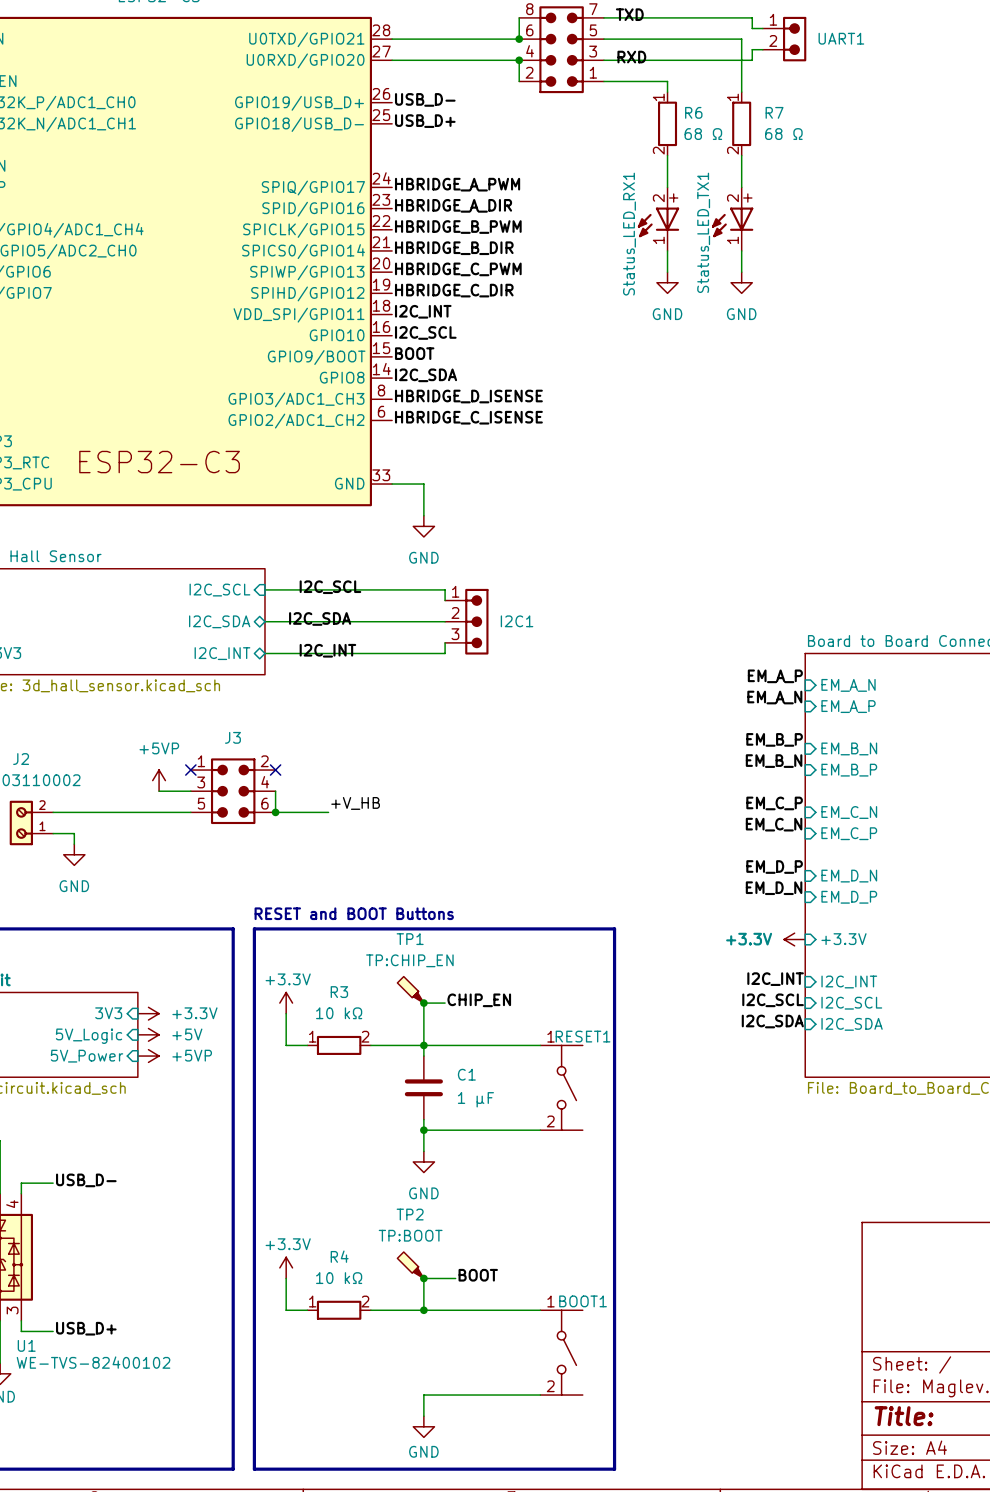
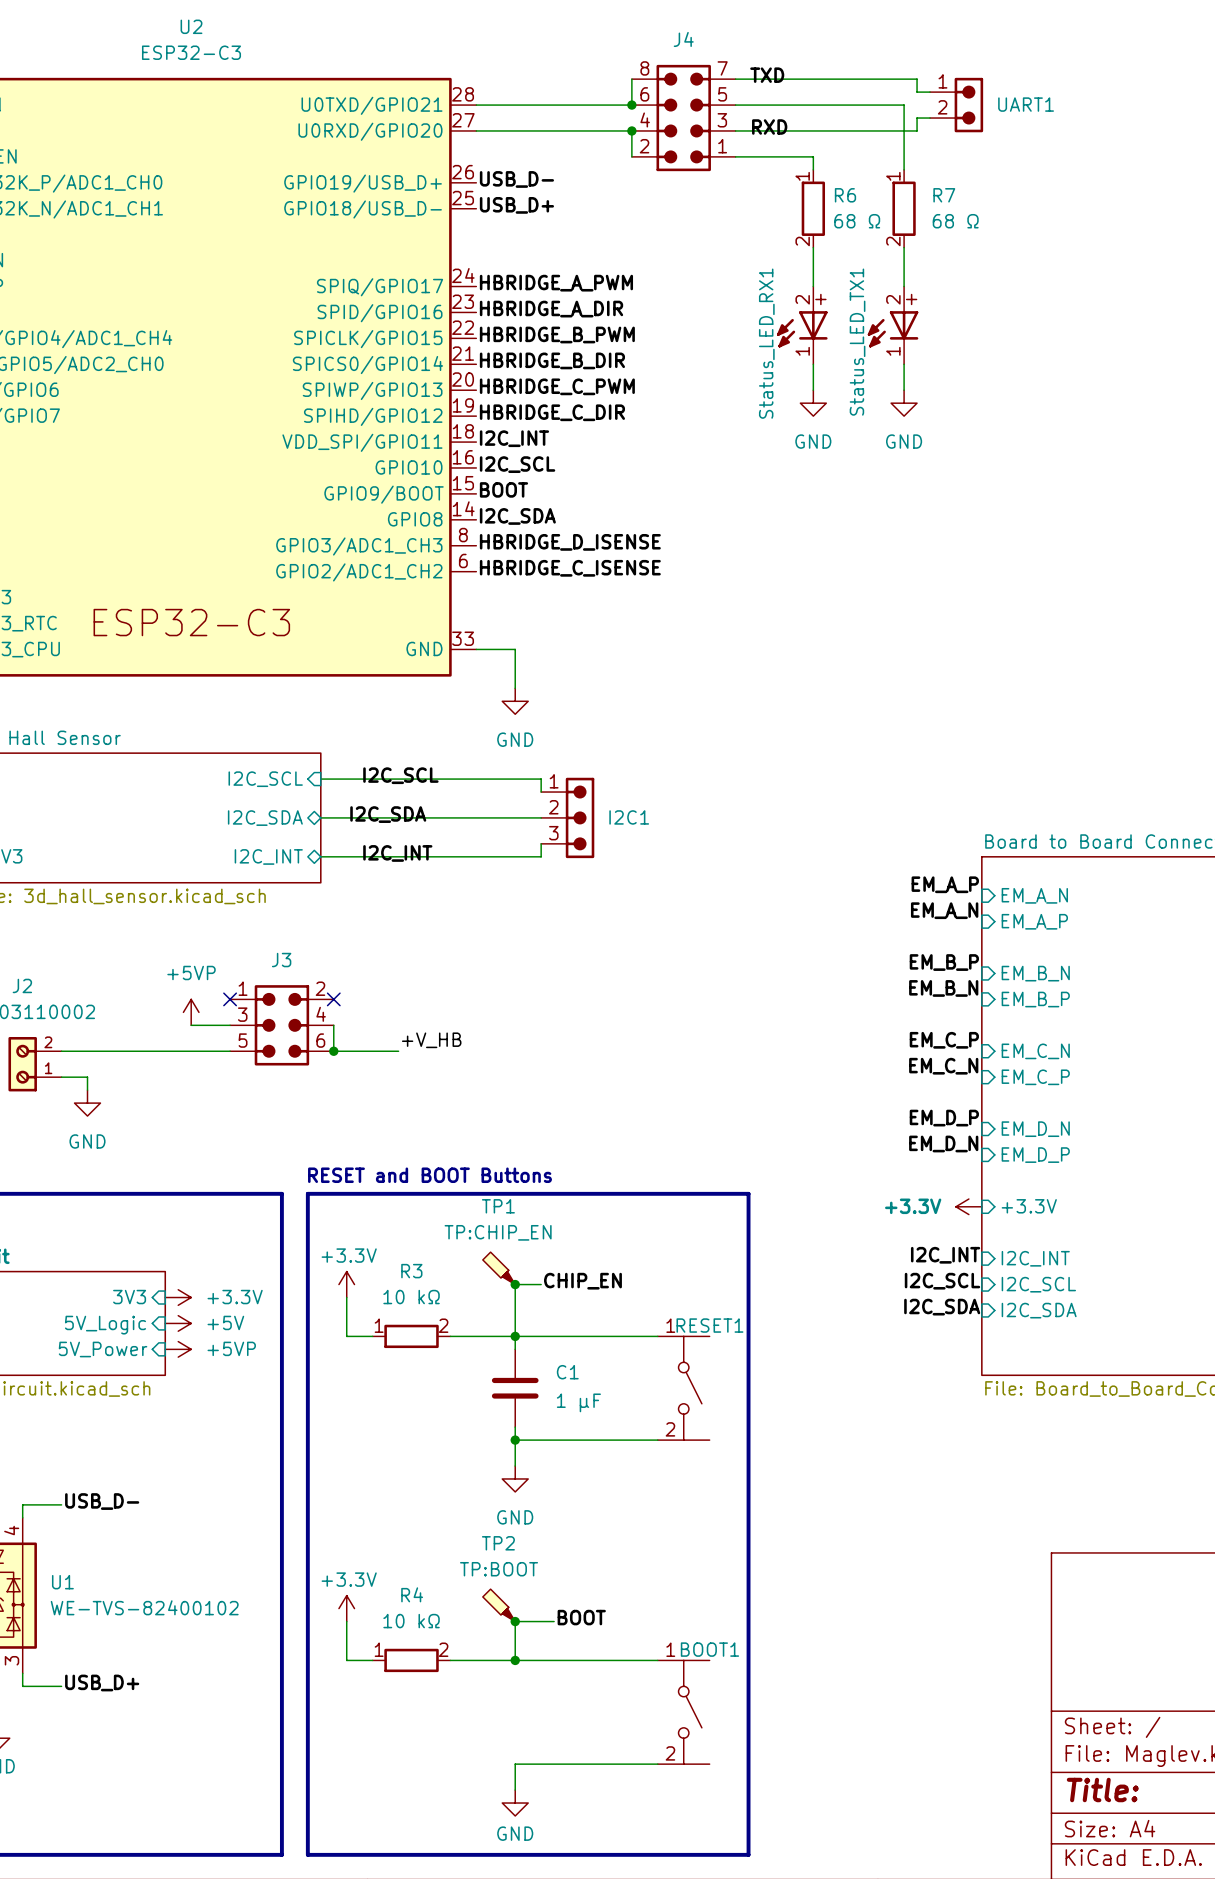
U1 name position: U1 (26, 1345) -> U1 (62, 1582)
U1 value position: WE-TVS-82400102 (93, 1362) -> WE-TVS-82400102 (144, 1607)

